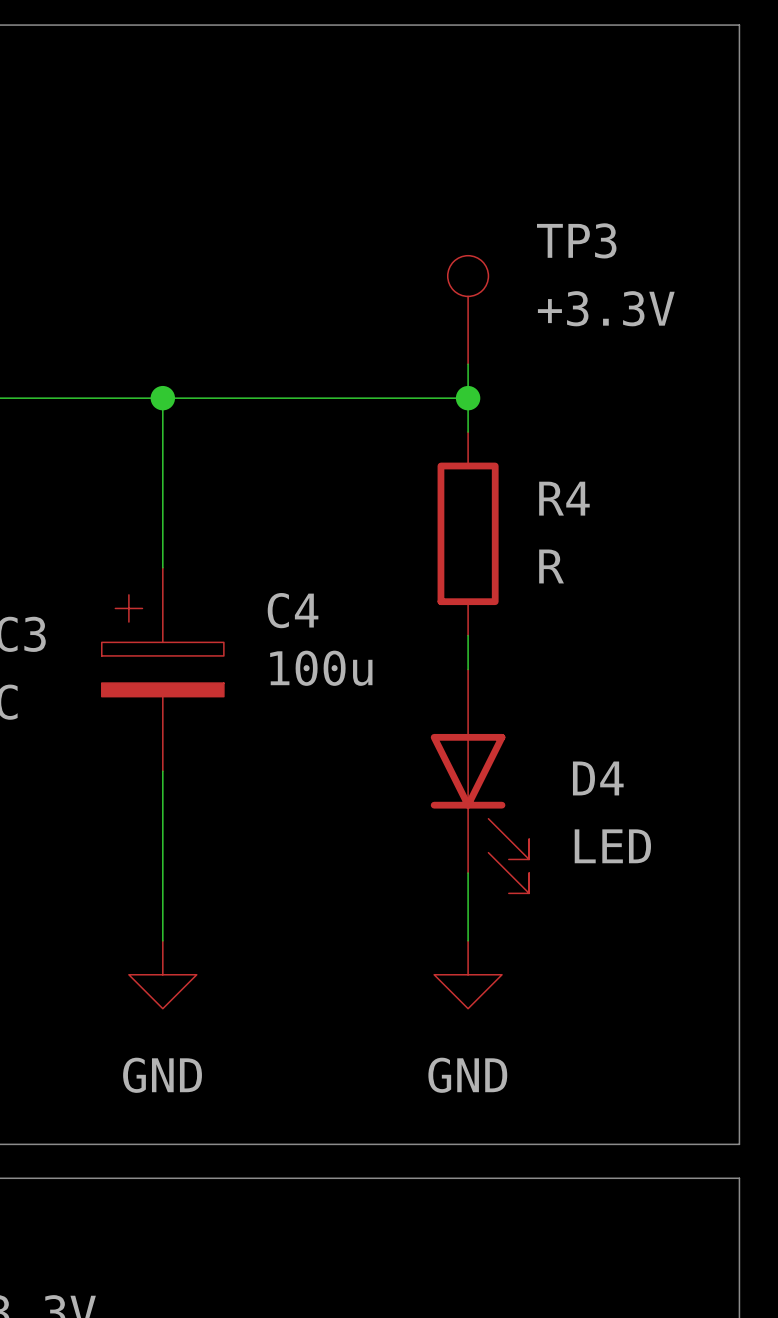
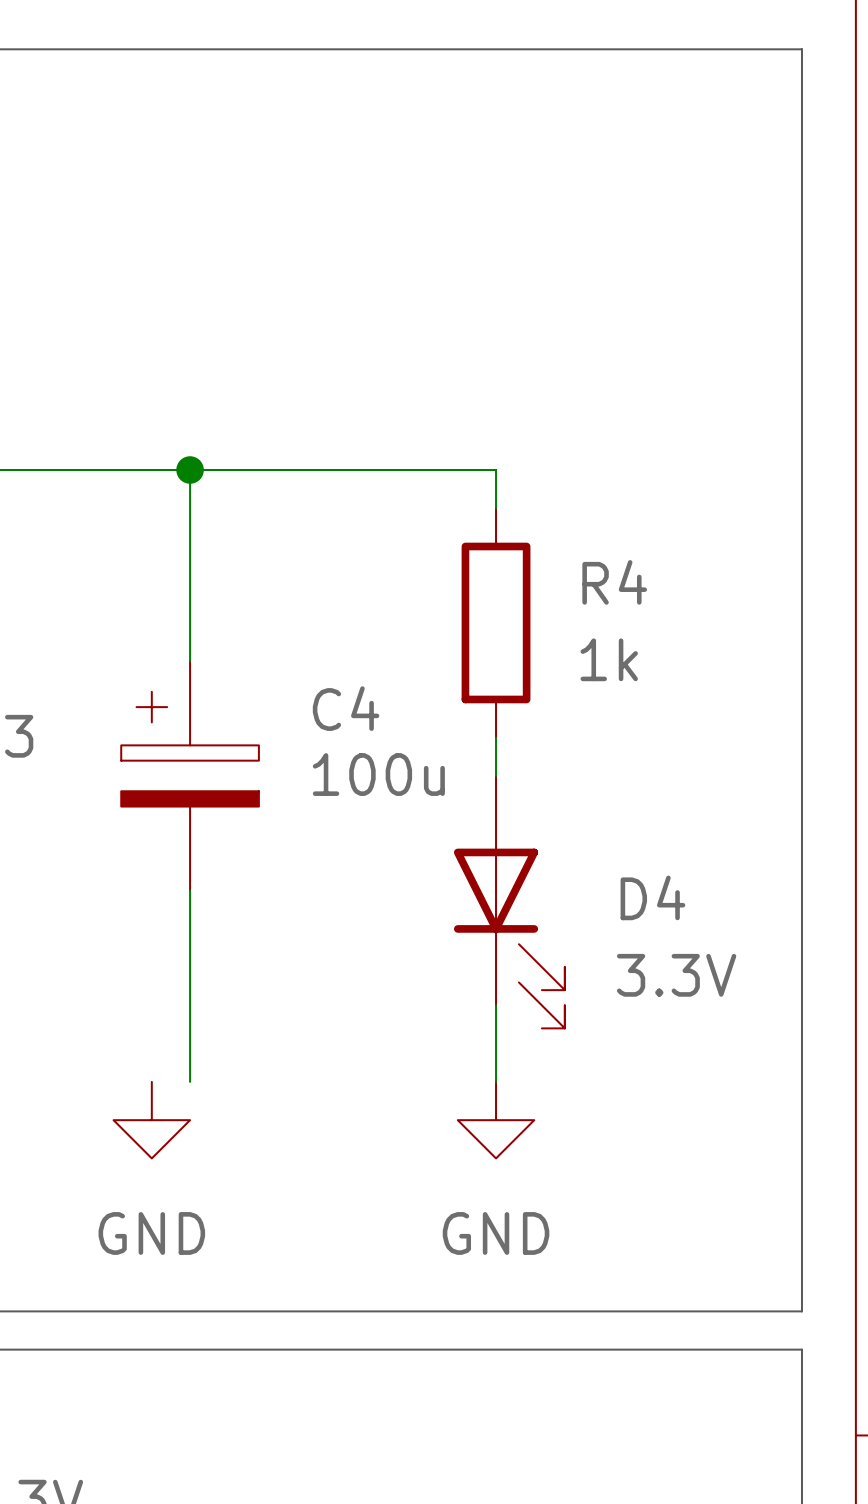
TP3: +3.3V (468, 309) -> none
wire: (468, 364) (468, 398) -> none
wire: (162, 398) (162, 567) -> (190, 470) (190, 661)
junction position: (162, 398) -> (190, 470)
junction: (468, 398) -> none
R4 value: R (551, 566) -> 1k (609, 659)
C4 position: (162, 669) -> (190, 775)
wire: (162, 771) (162, 940) -> (190, 890) (190, 1081)
D4 value: LED (612, 846) -> 3.3V (676, 975)

